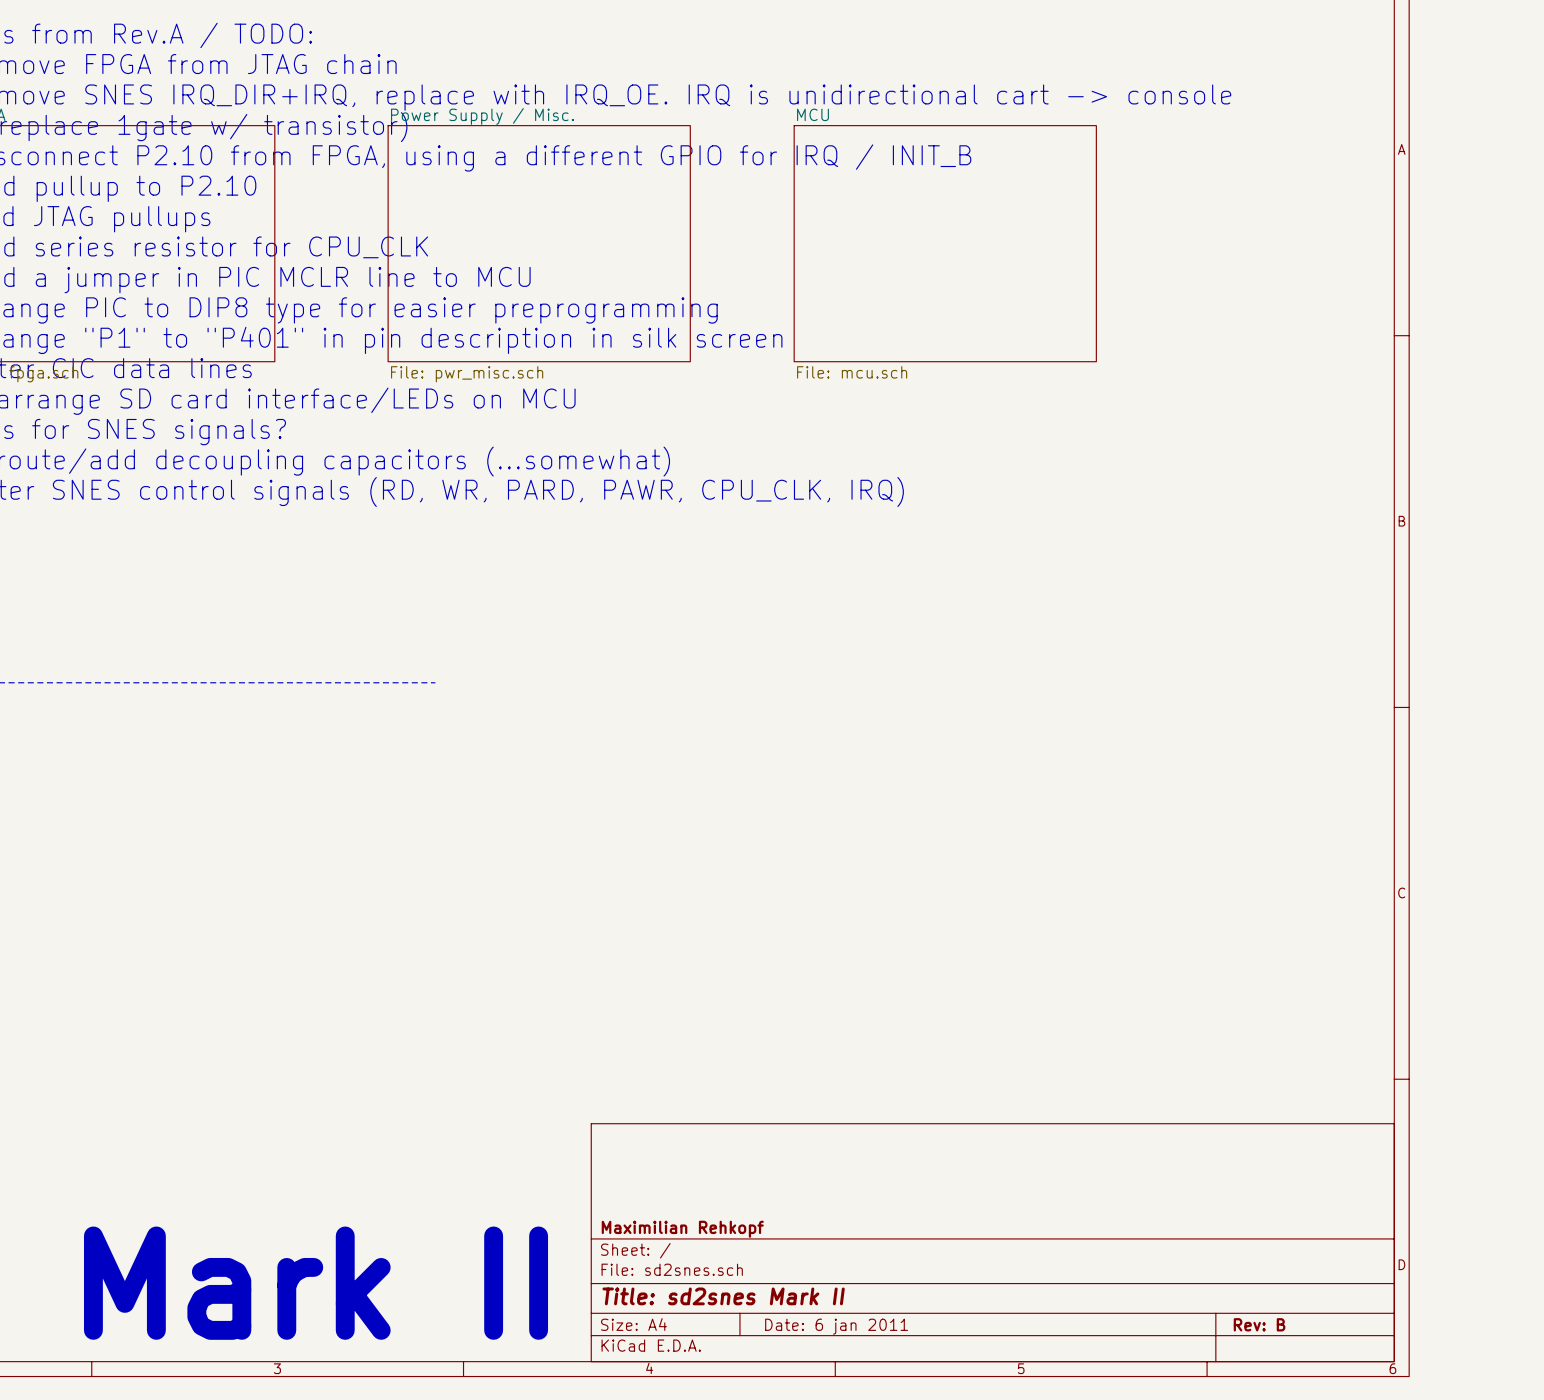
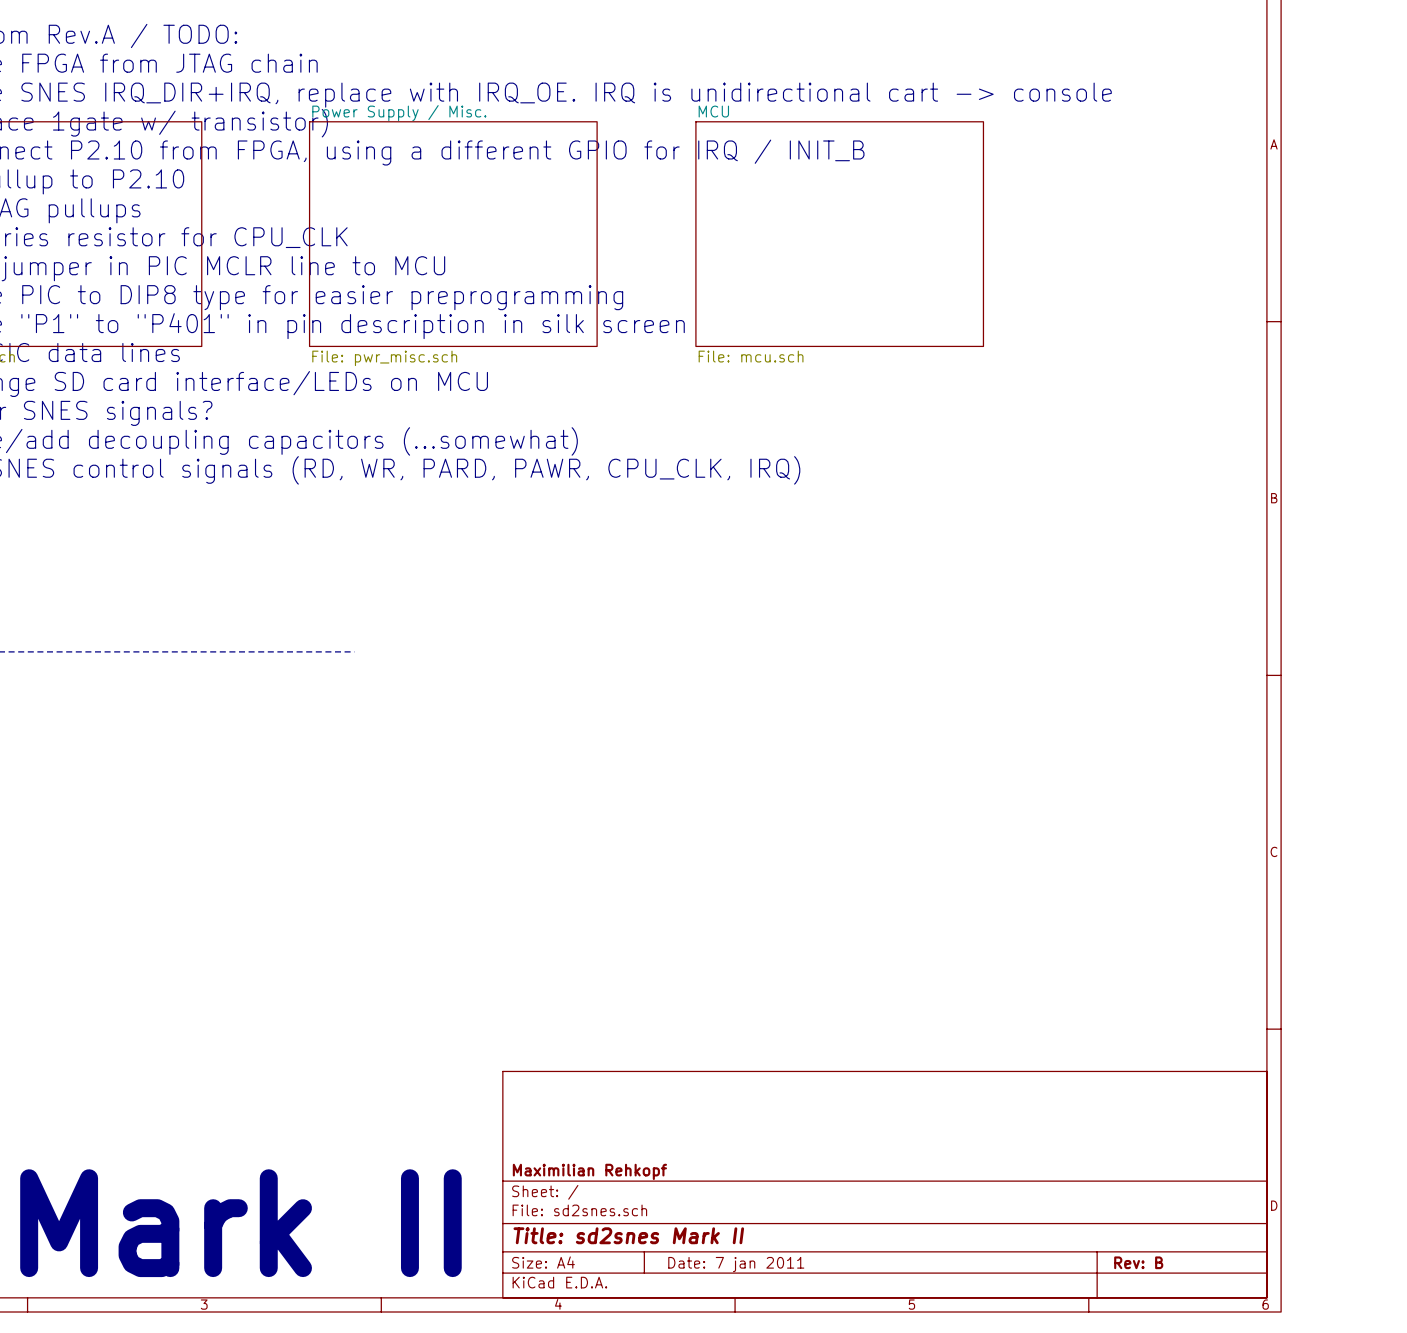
title block: Date: 6 jan 2011 (836, 1326) -> Date: 7 jan 2011 (736, 1264)

